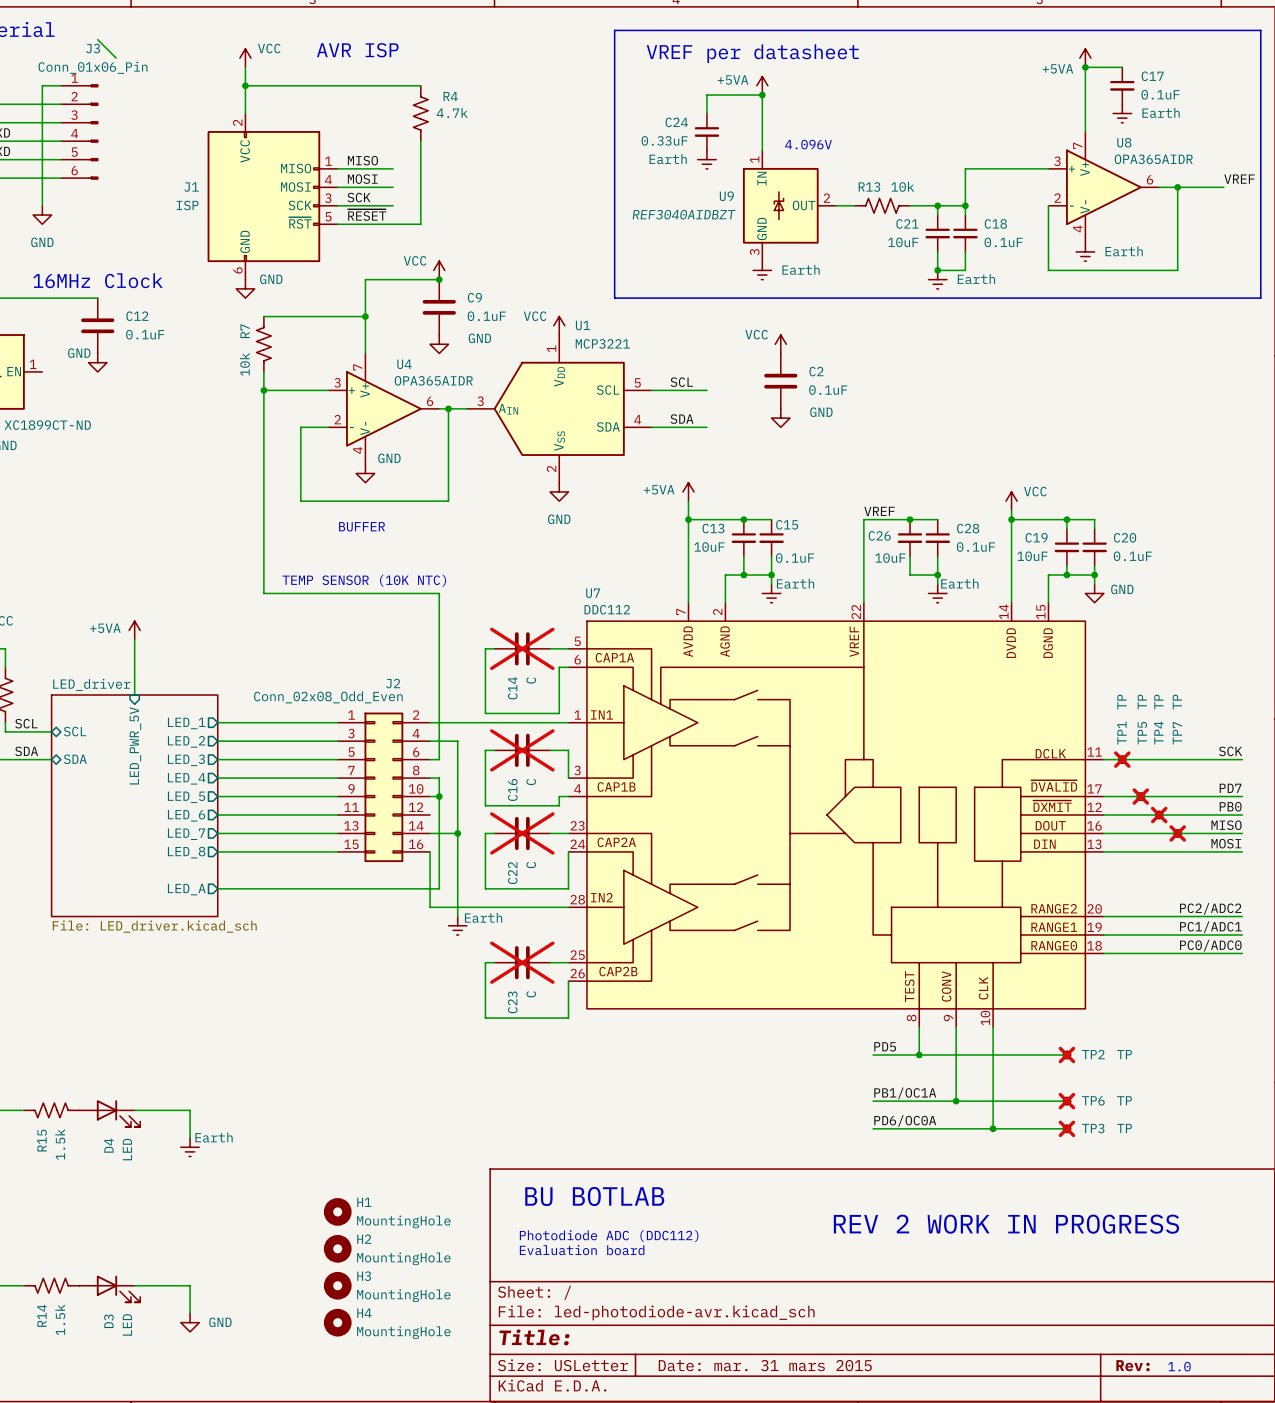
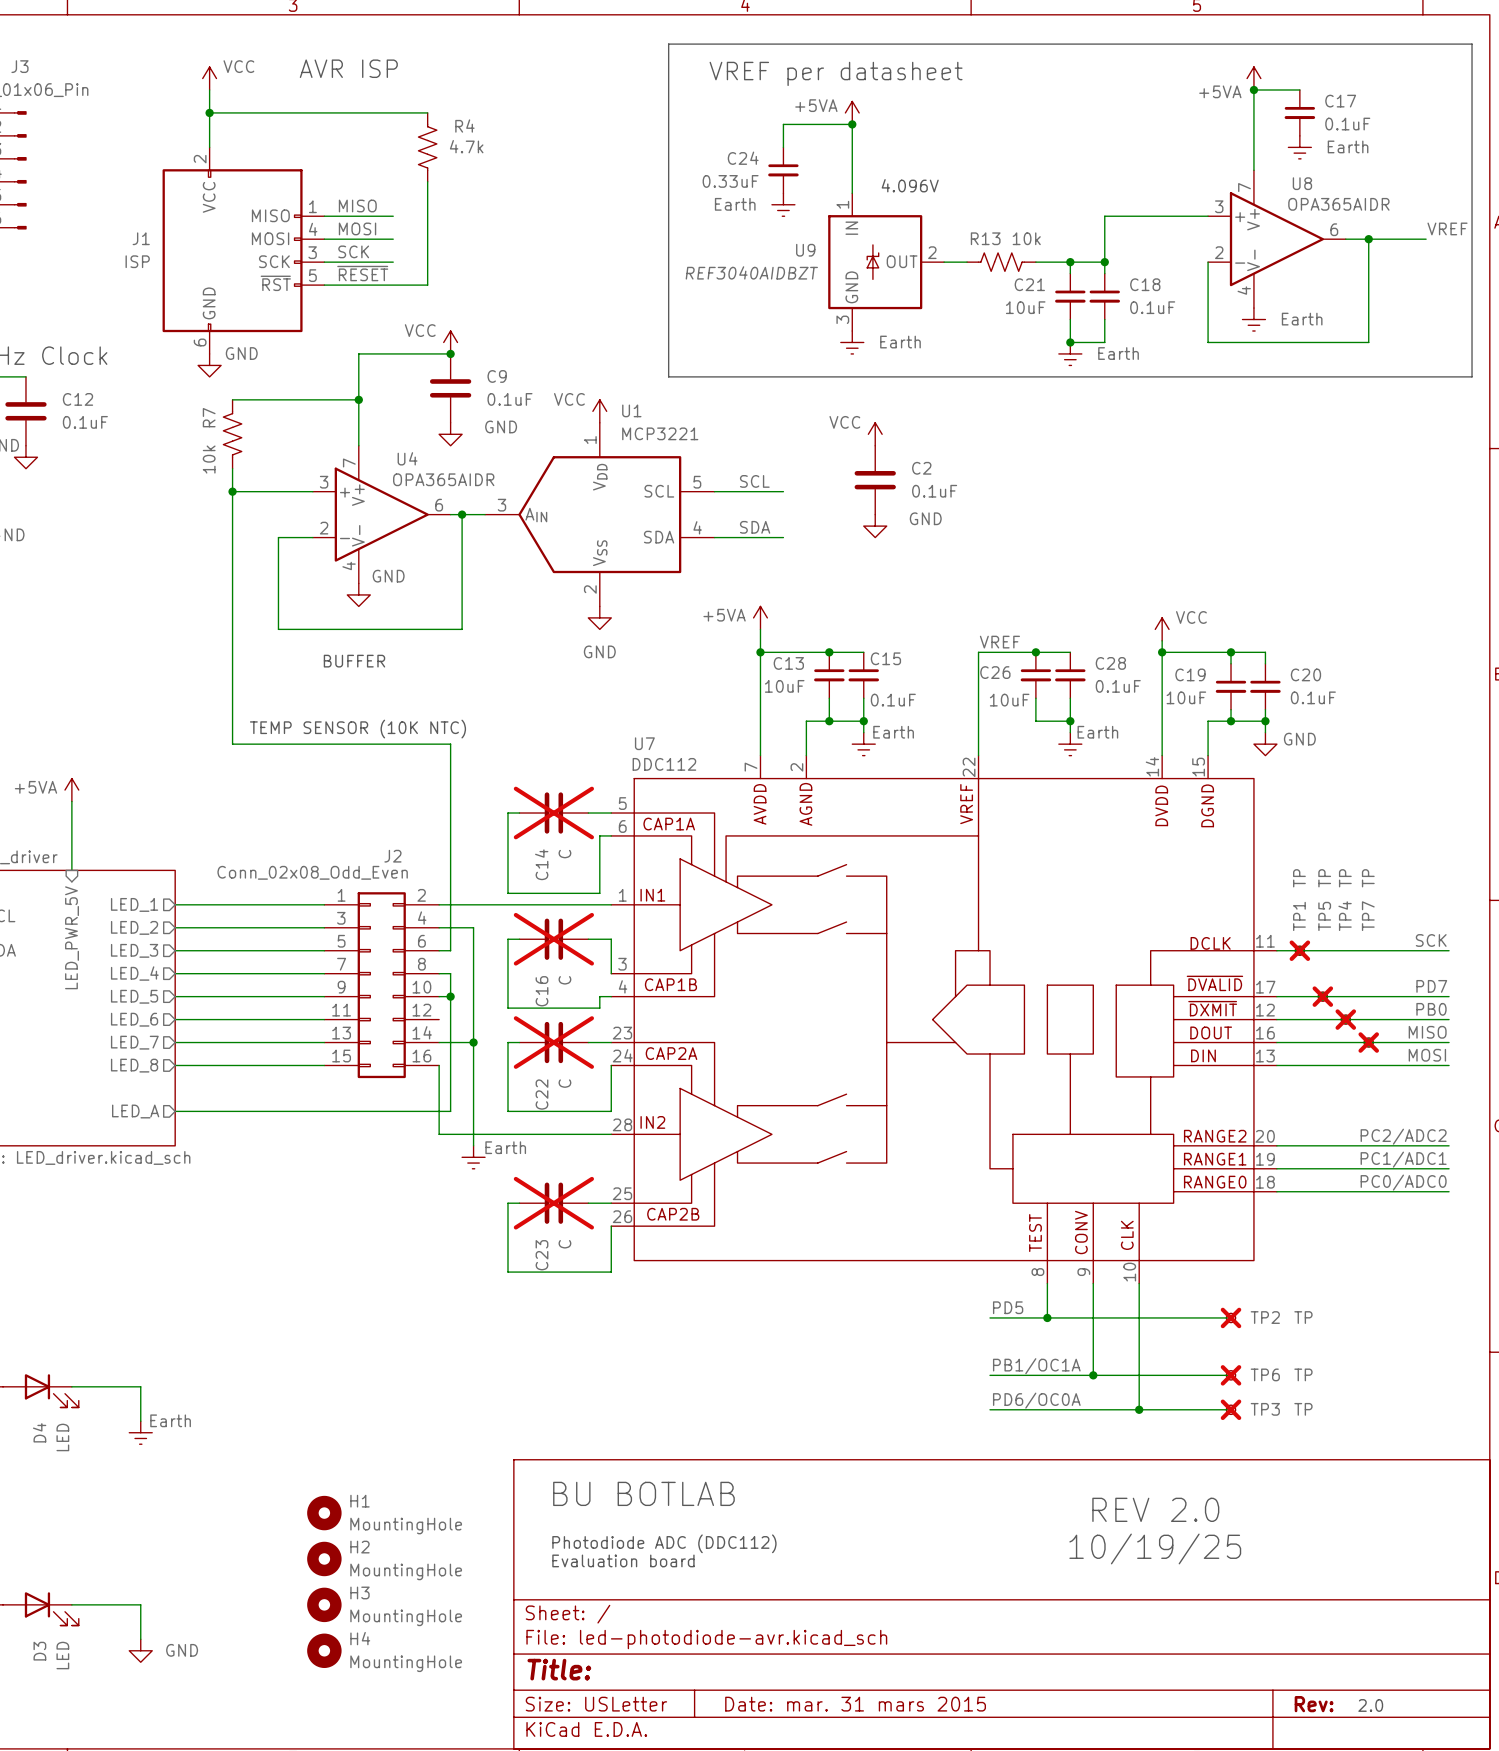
wire: (97, 39) (116, 58) -> none
text: none -> REV 2.0 (1155, 1509)
text: REV 2 WORK IN PROGRESS (1006, 1224) -> none
text: none -> 10/19/25 (1155, 1548)
text: 1.0 (1179, 1366) -> 2.0 (1370, 1705)

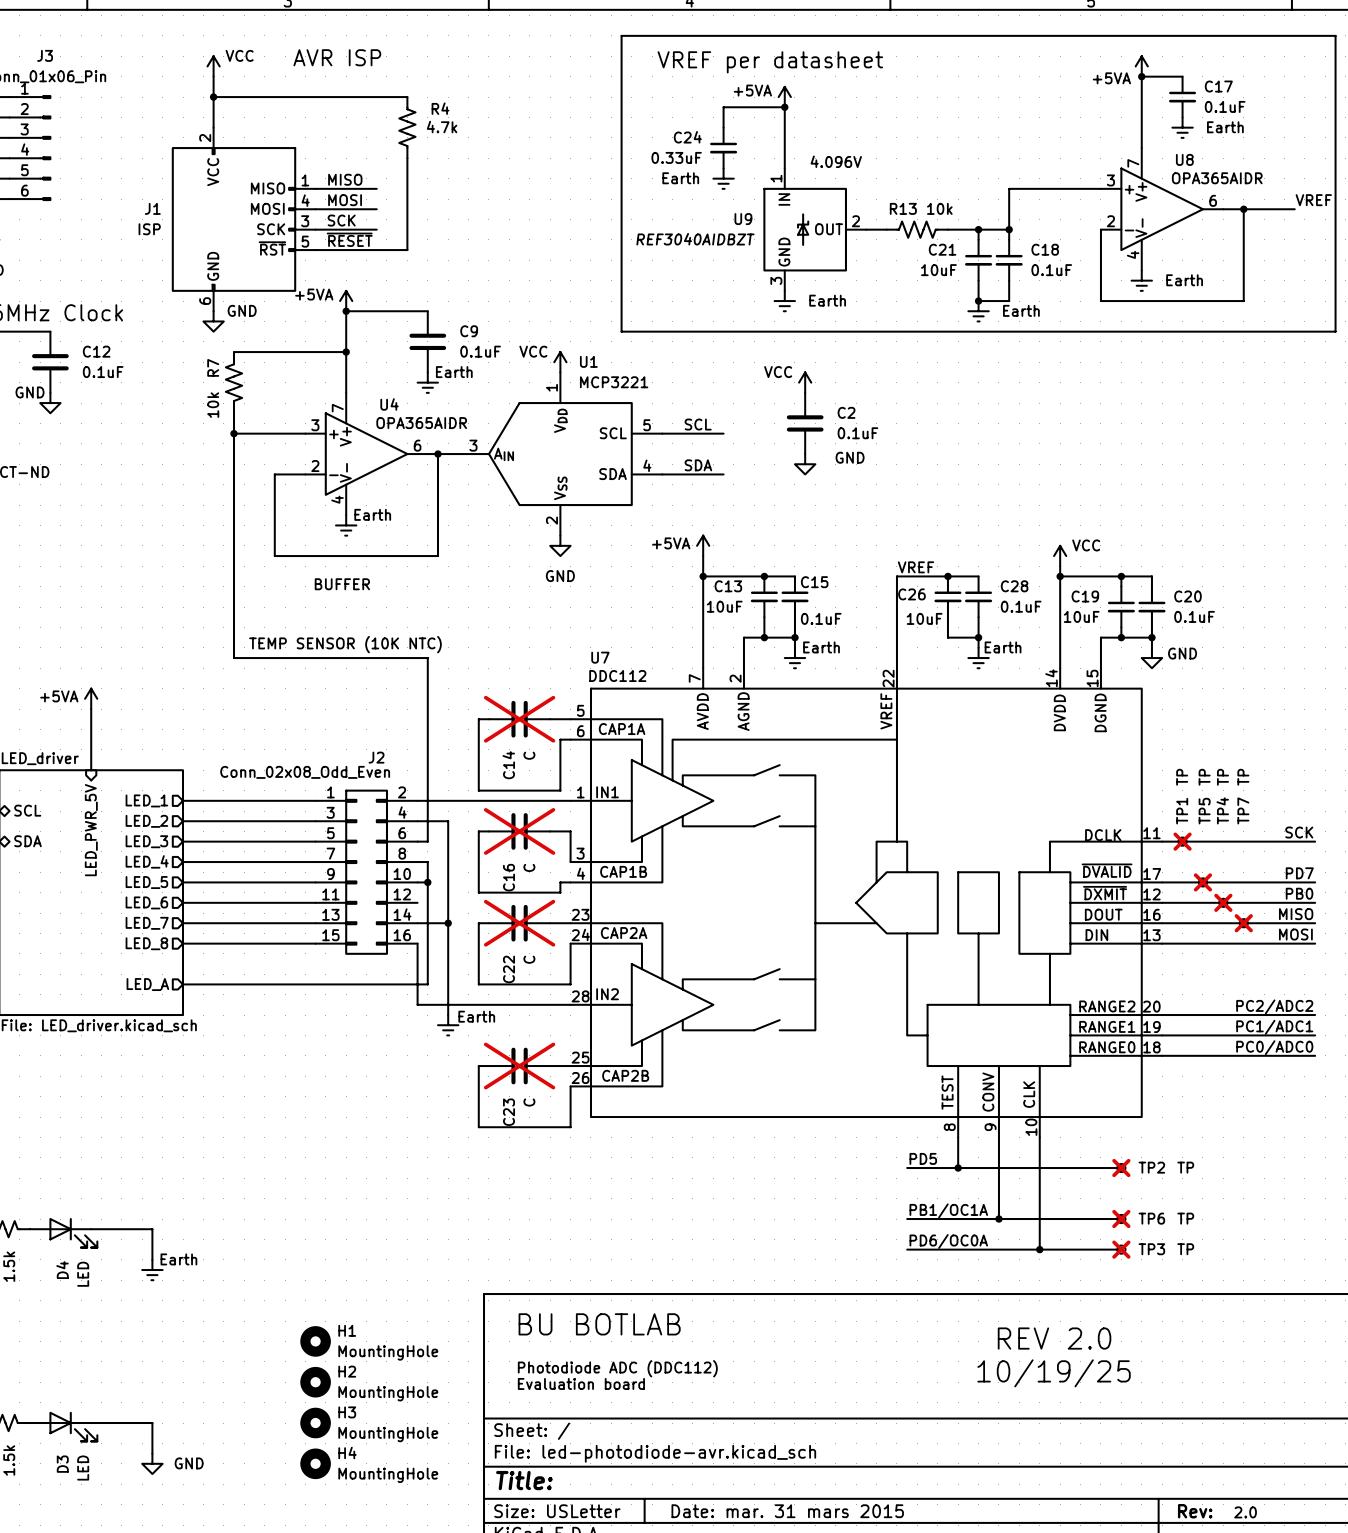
power symbol: none -> +5VA (346, 301)
power symbol: VCC (450, 342) -> none
junction: none -> (346, 311)
junction: (450, 353) -> none
power symbol: GND (450, 434) -> Earth (427, 382)
power symbol: GND (358, 594) -> Earth (346, 525)

